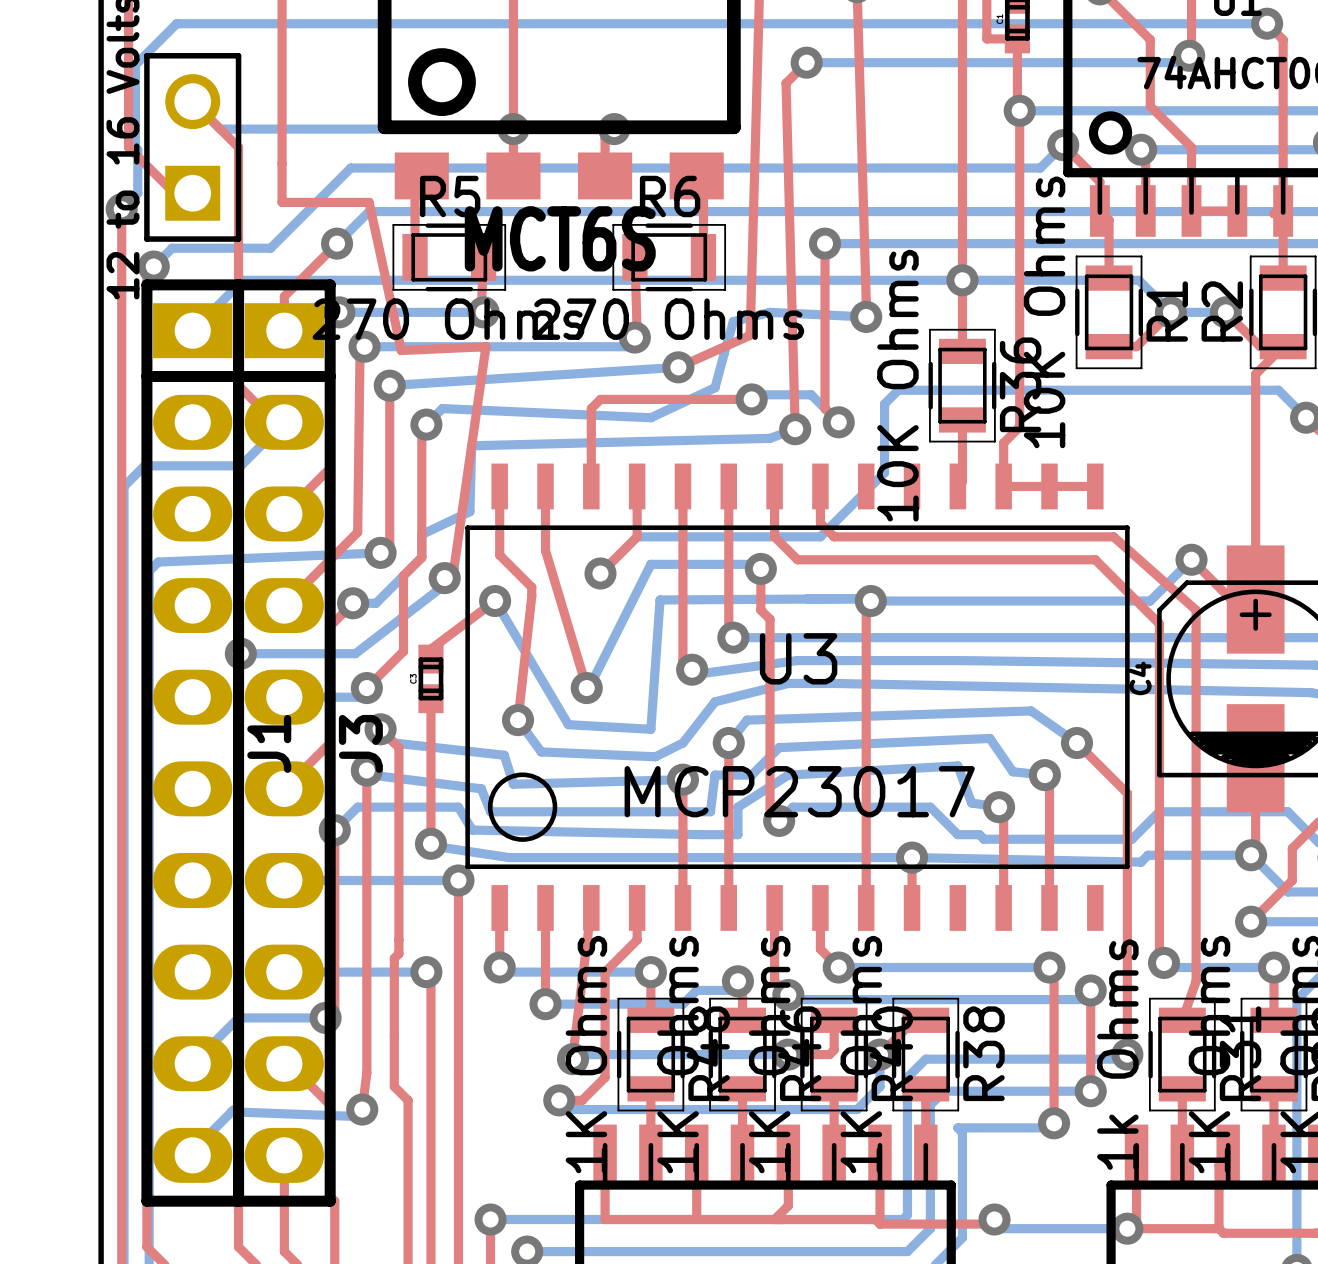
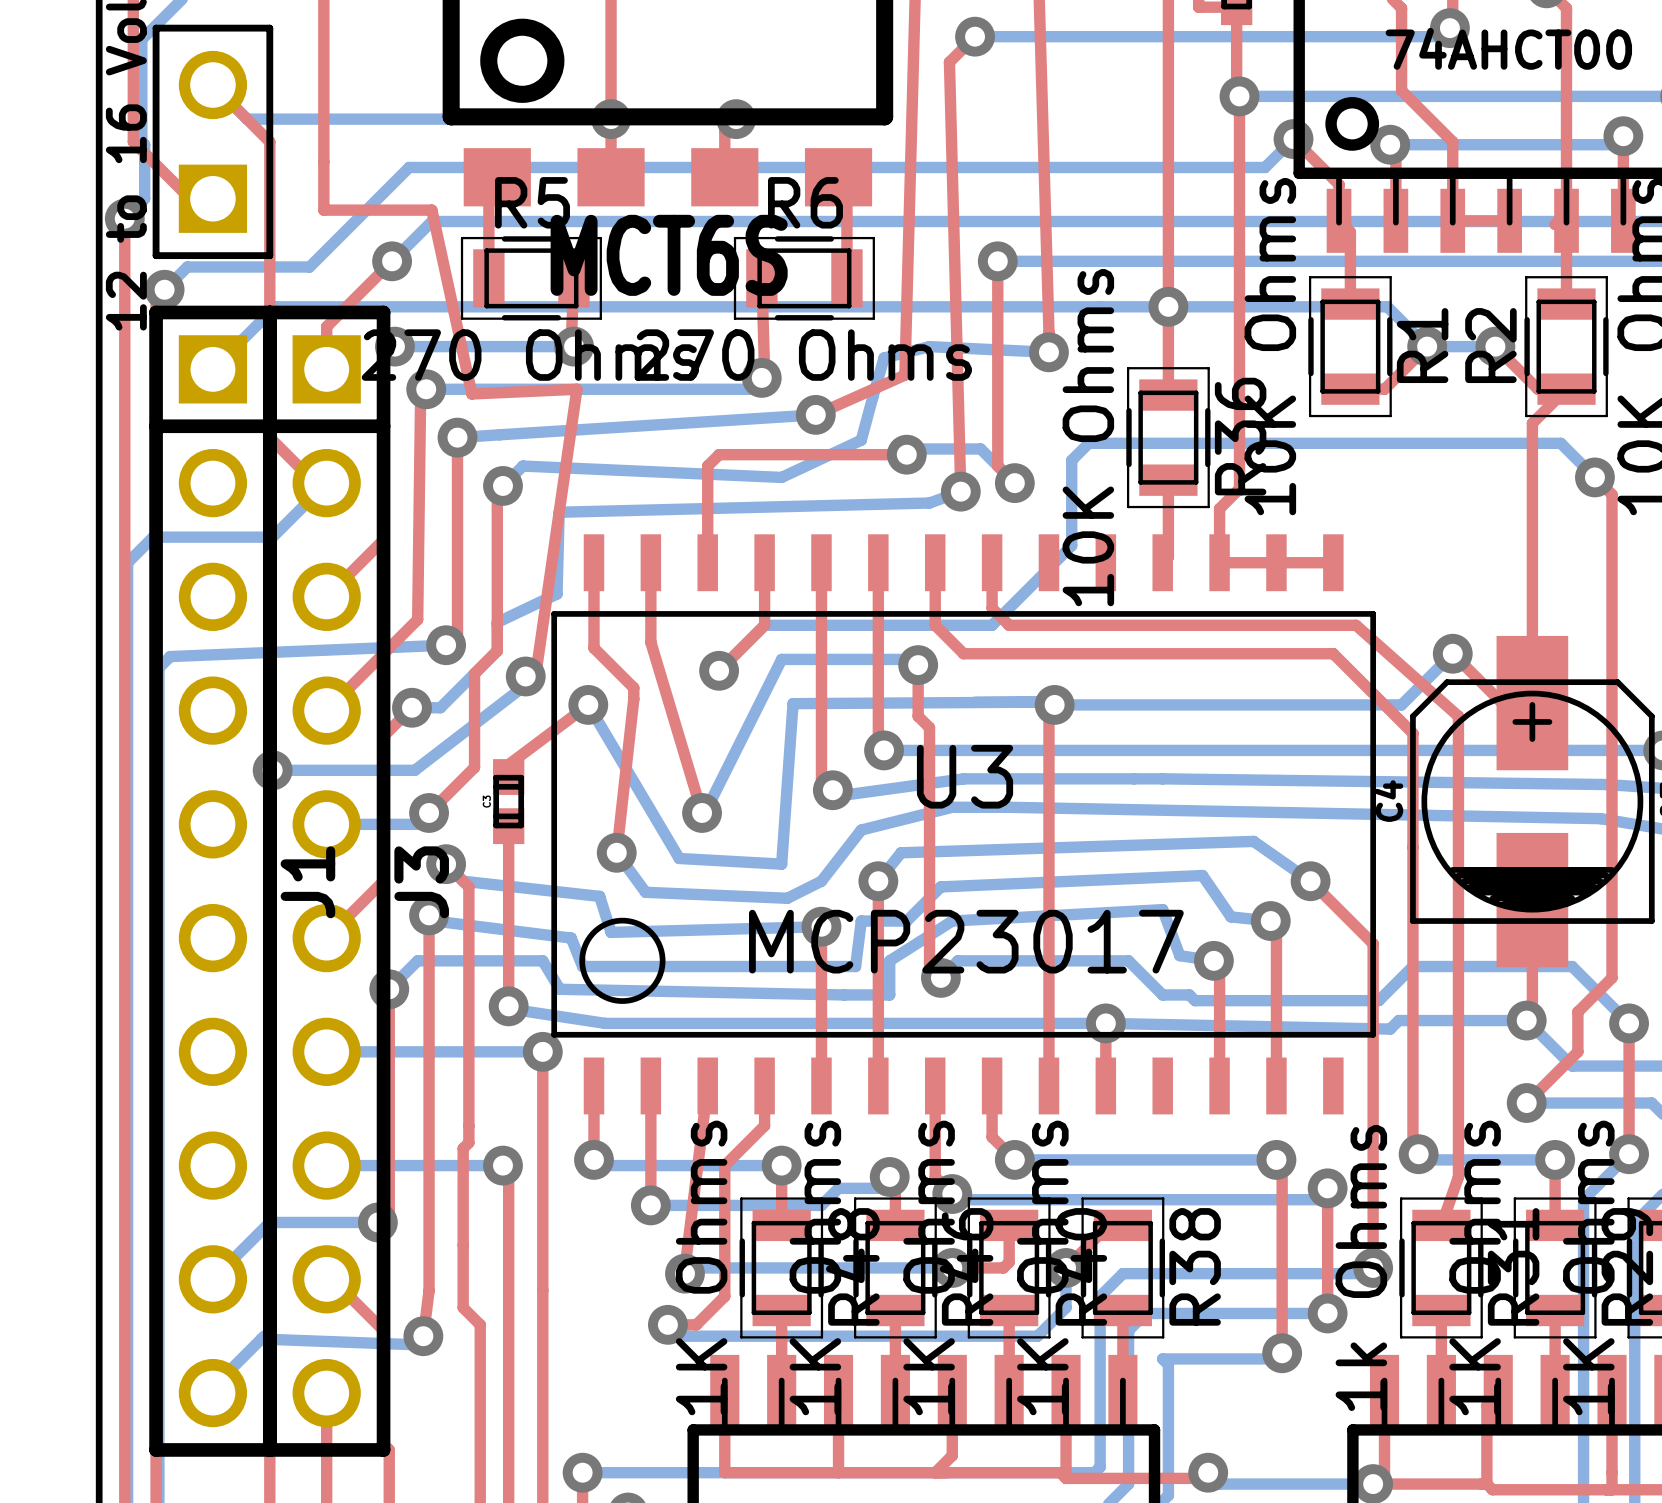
J1 footprint: [141, 279, 245, 1207] -> [149, 305, 277, 1457]
J3 footprint: [233, 279, 336, 1207] -> [262, 305, 391, 1457]

